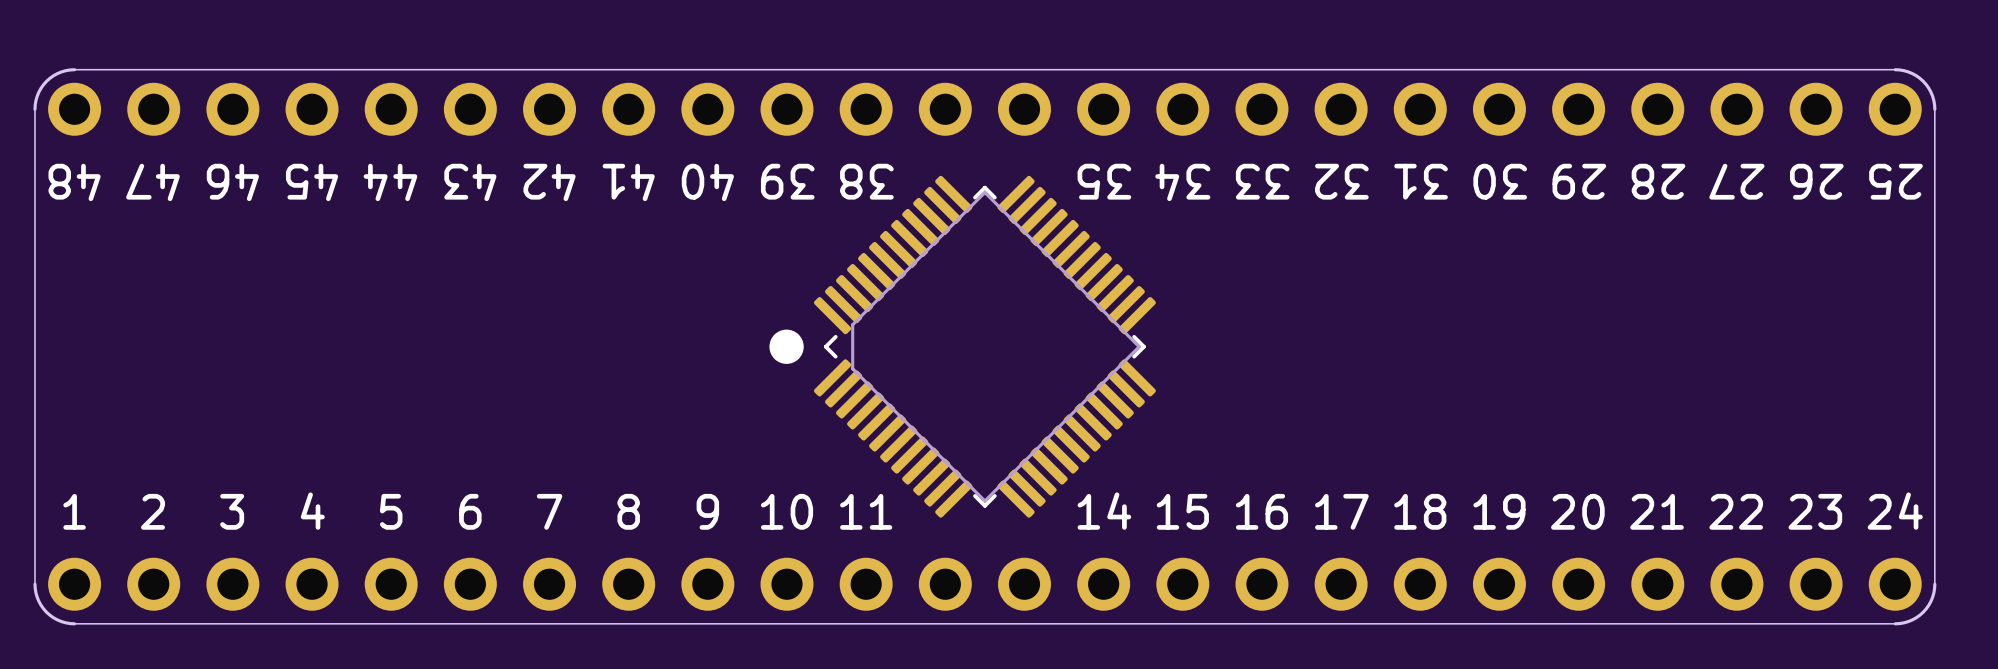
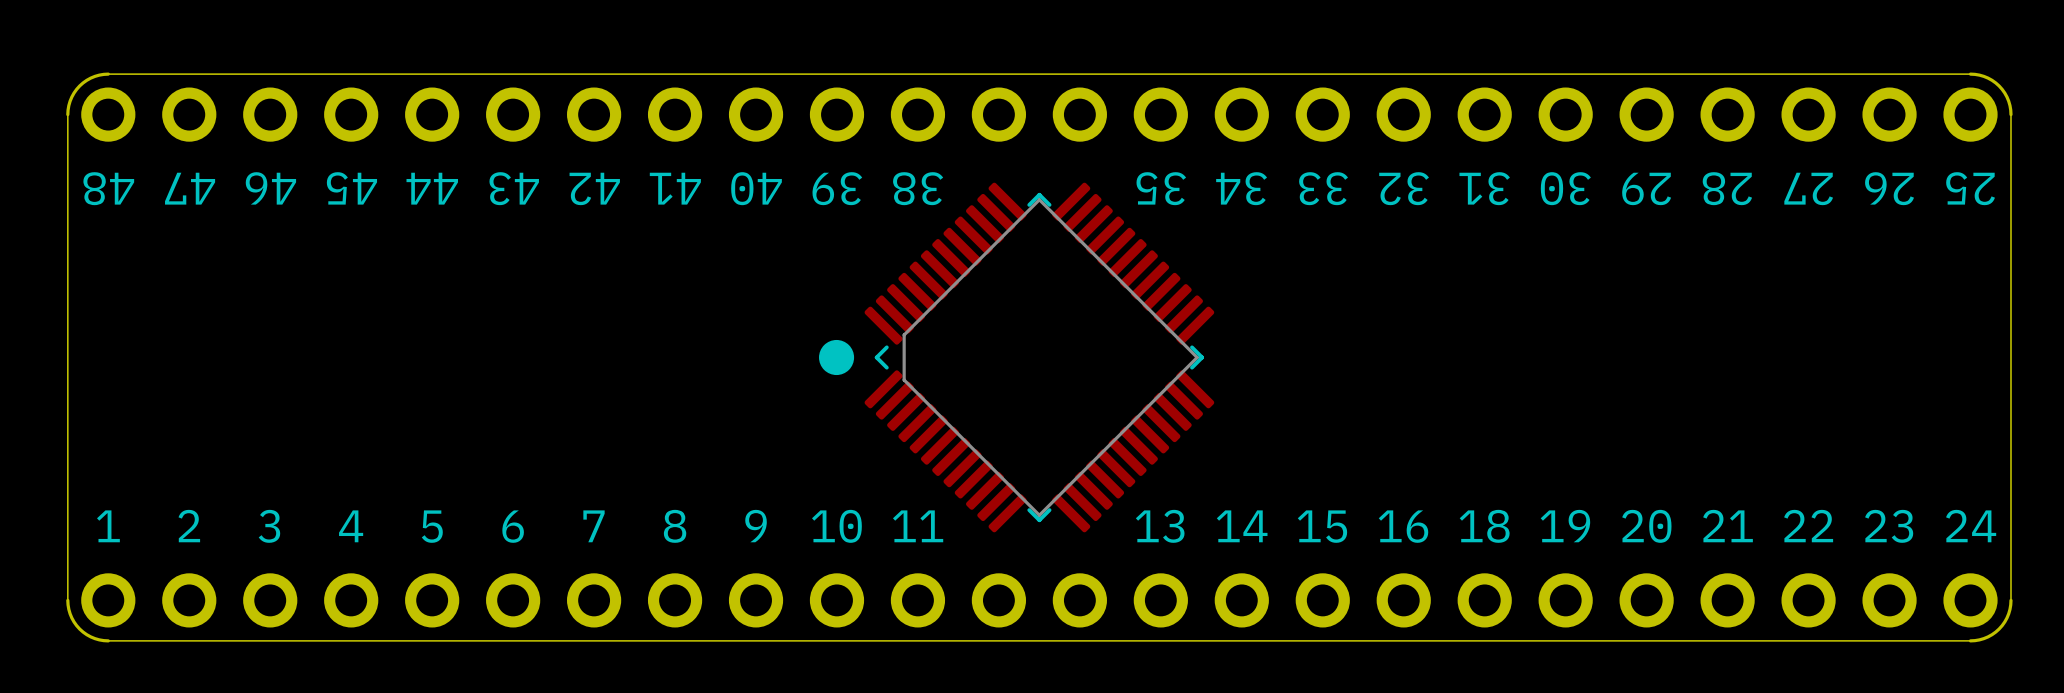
text: 14 (1104, 511) -> 13 (1160, 526)
text: 15 (1182, 511) -> 14 (1242, 526)
text: 16 (1261, 511) -> 15 (1322, 526)
text: 17 (1341, 511) -> 16 (1403, 526)

